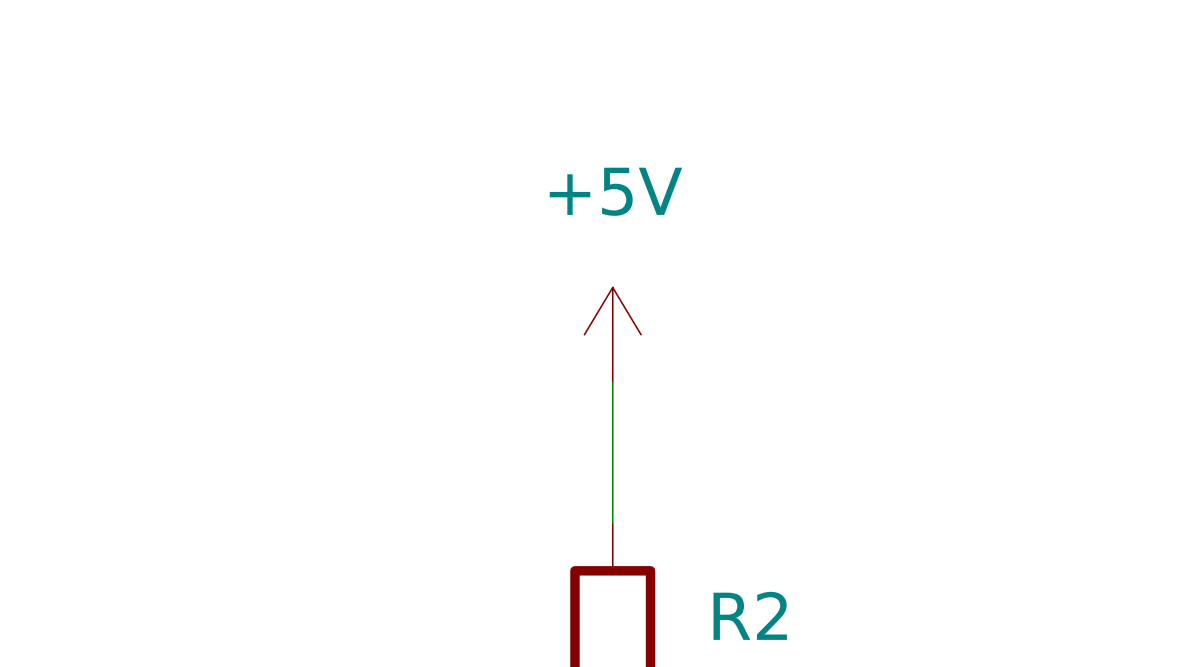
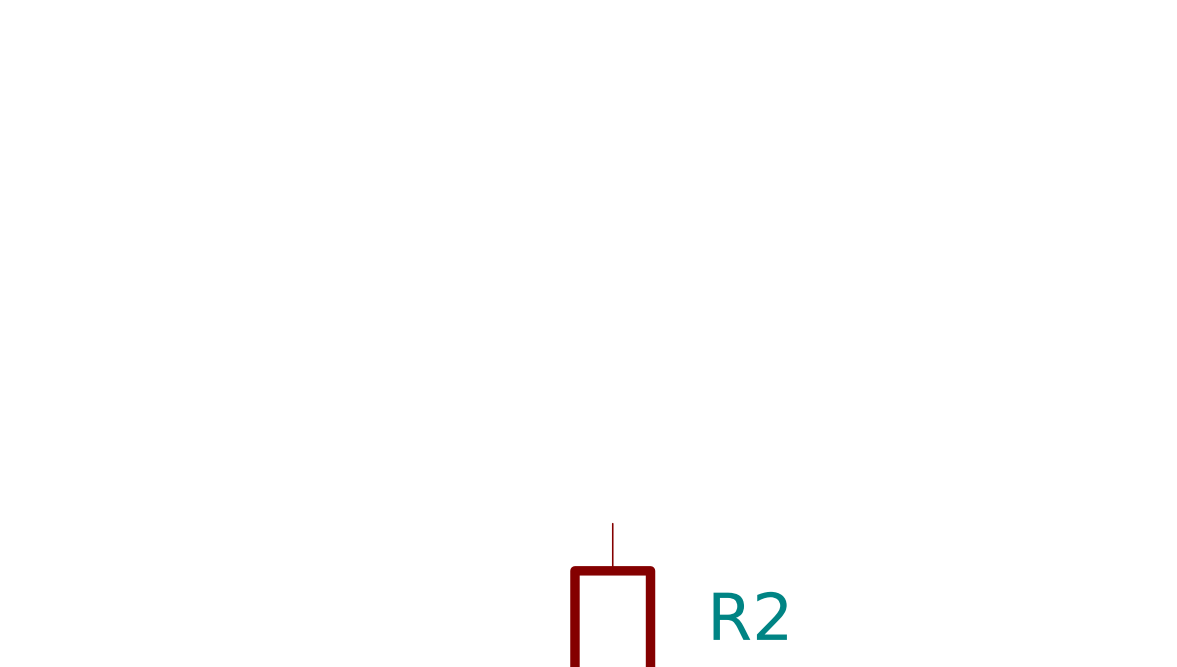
power symbol: +5V (612, 334) -> none
wire: (612, 381) (612, 523) -> none

